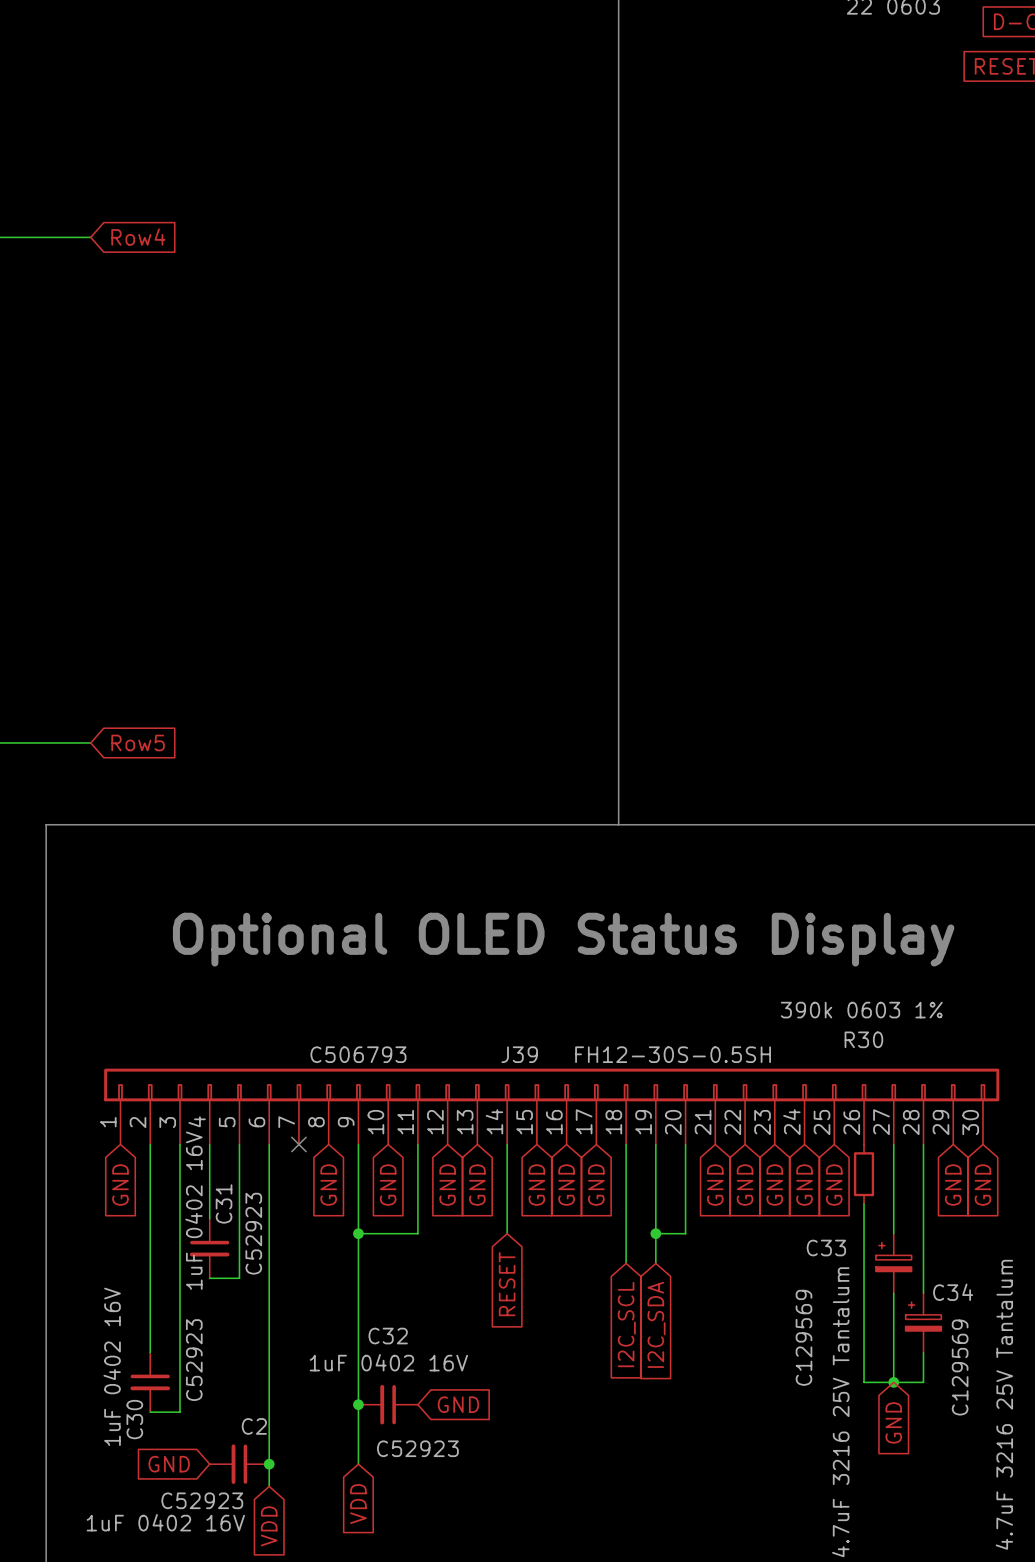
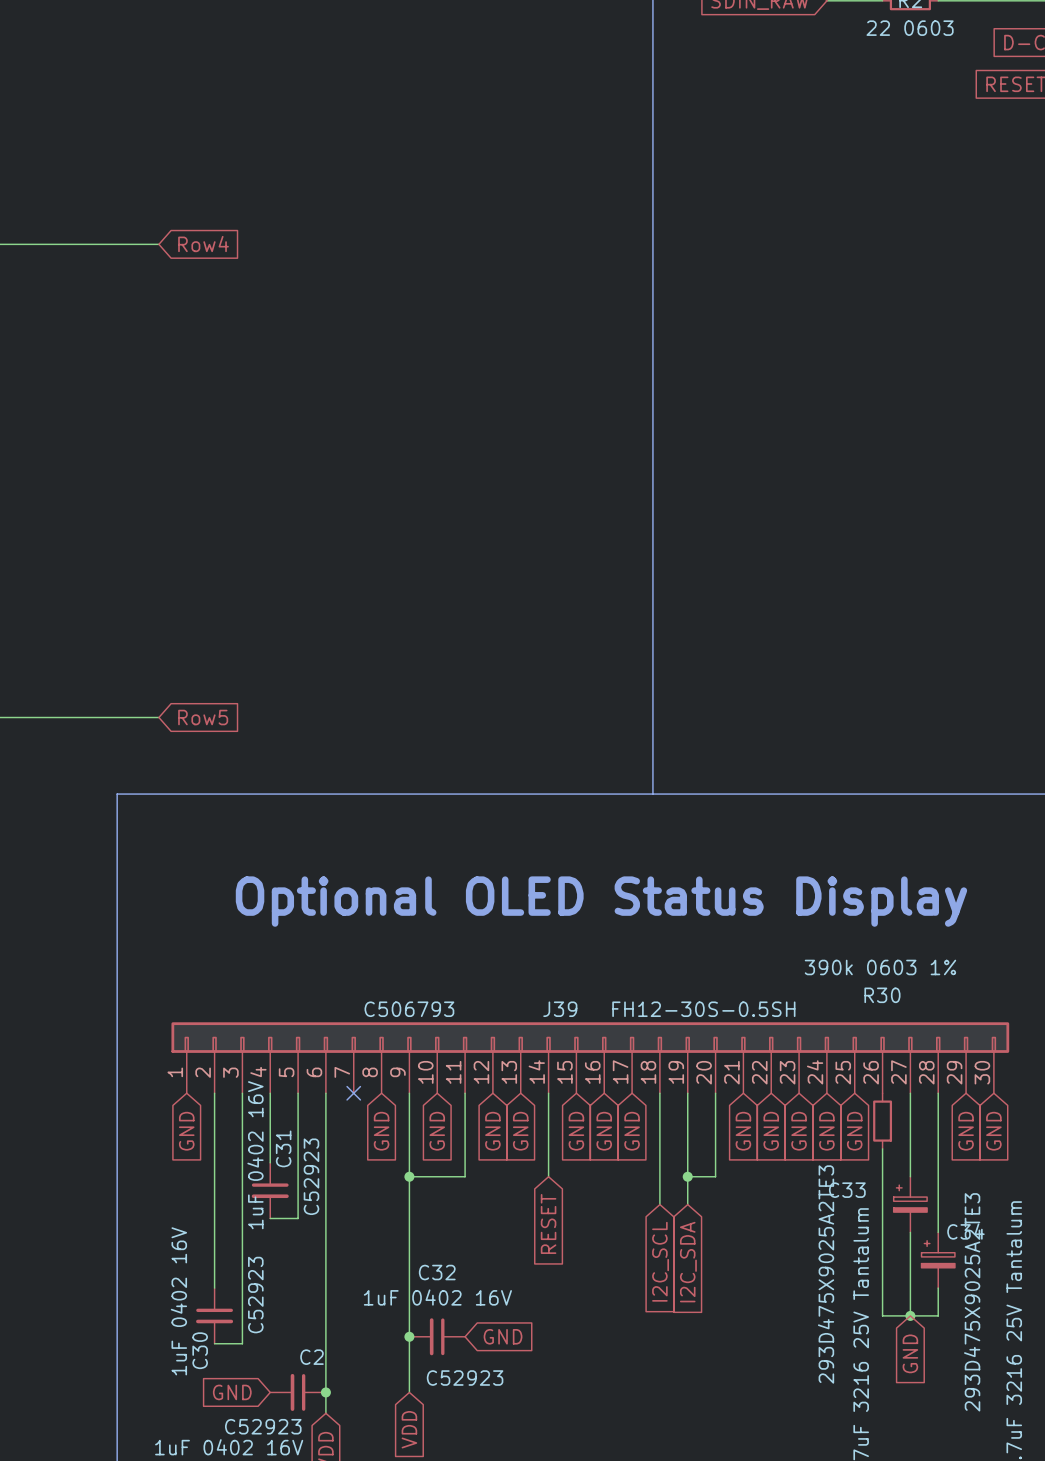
C33 text: C129569 (803, 1337) -> 293D475X9025A2TE3 (826, 1274)
C34 text: C129569 (960, 1367) -> 293D475X9025A2TE3 (972, 1302)

